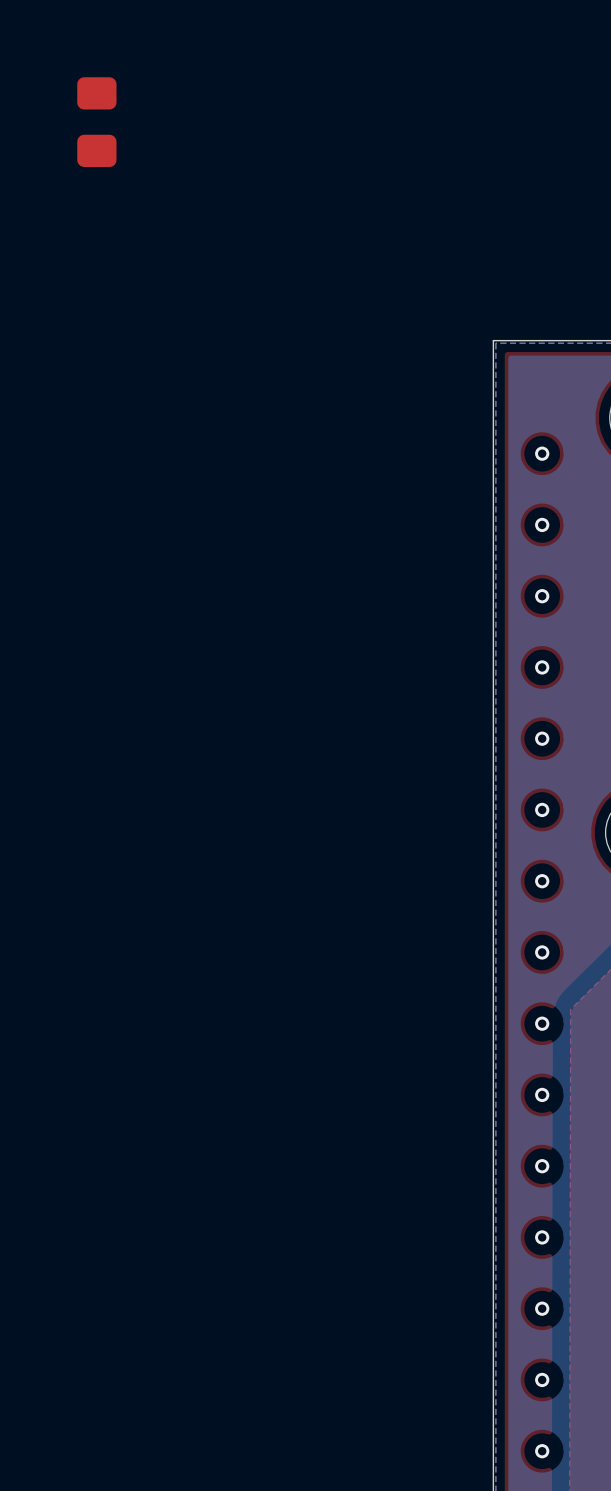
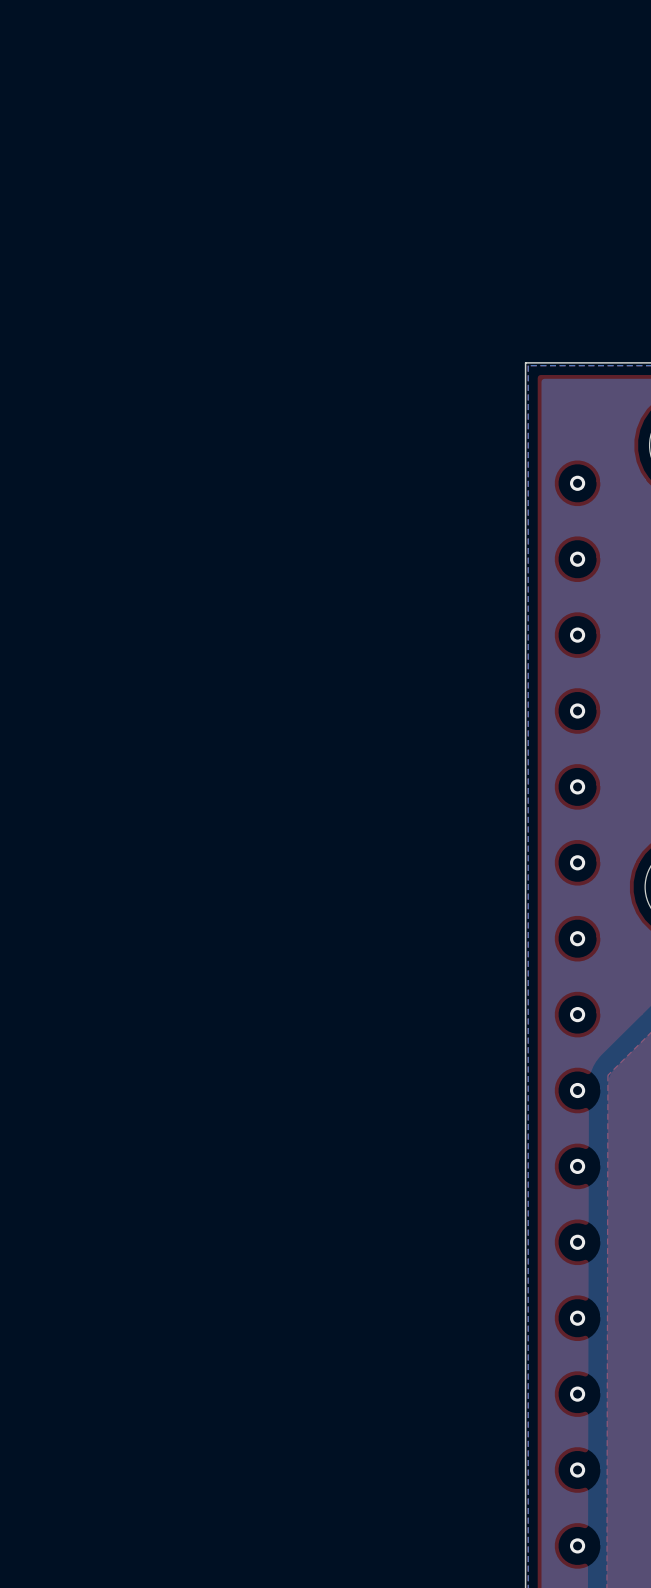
part: (96, 122) -> none

